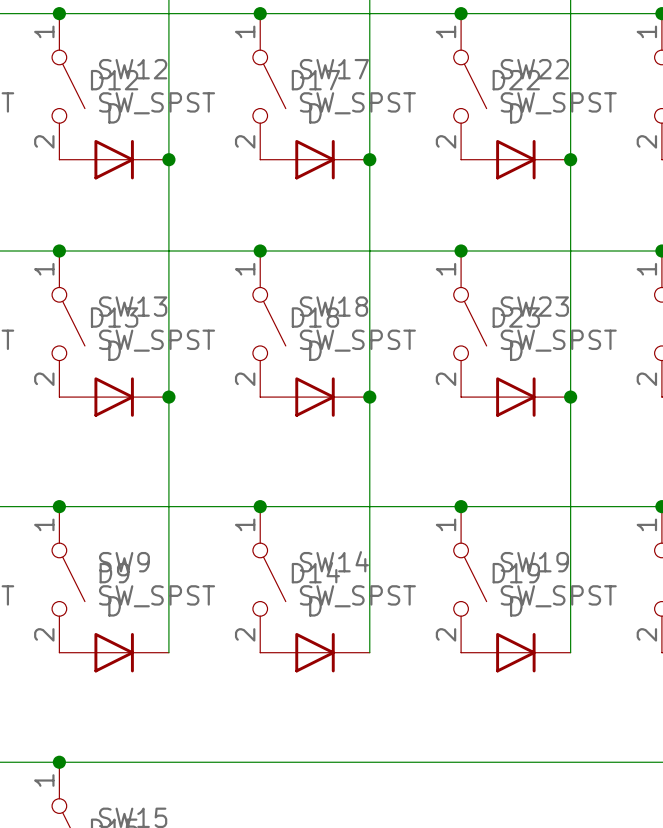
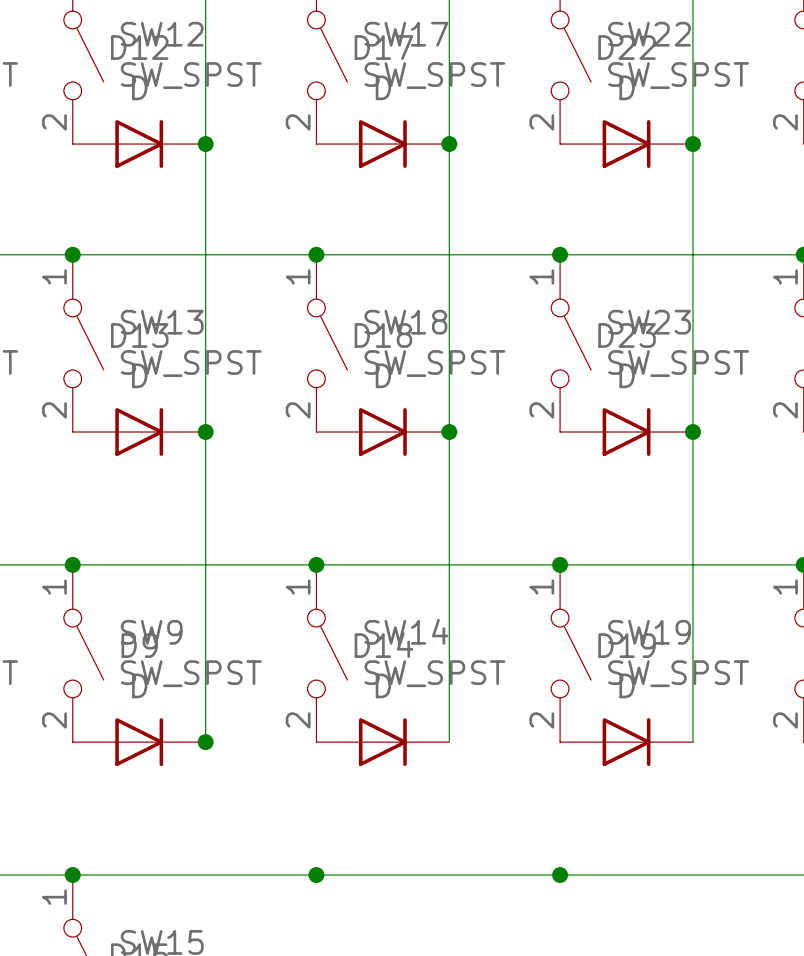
junction: none -> (205, 742)
junction: none -> (316, 875)
junction: none -> (560, 875)

